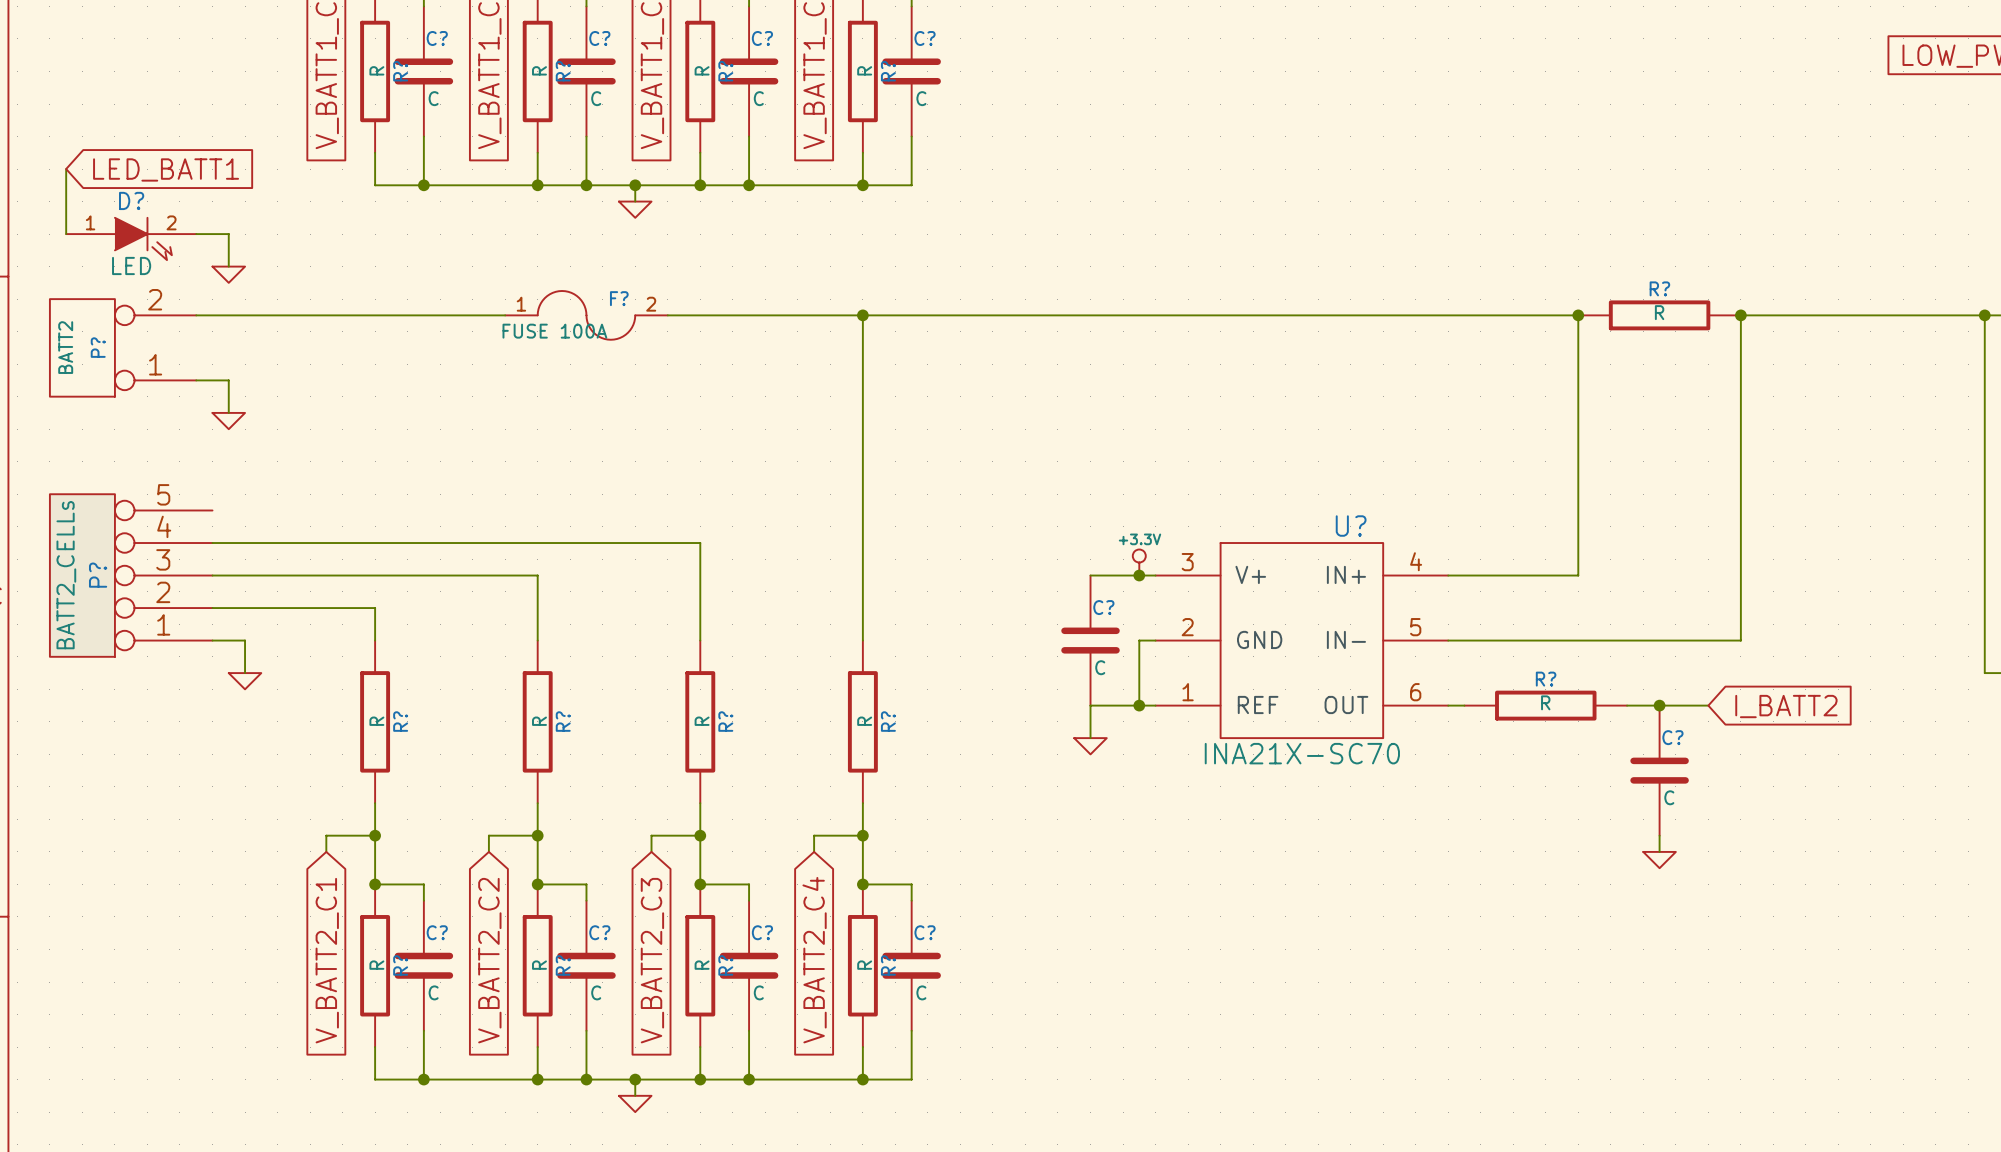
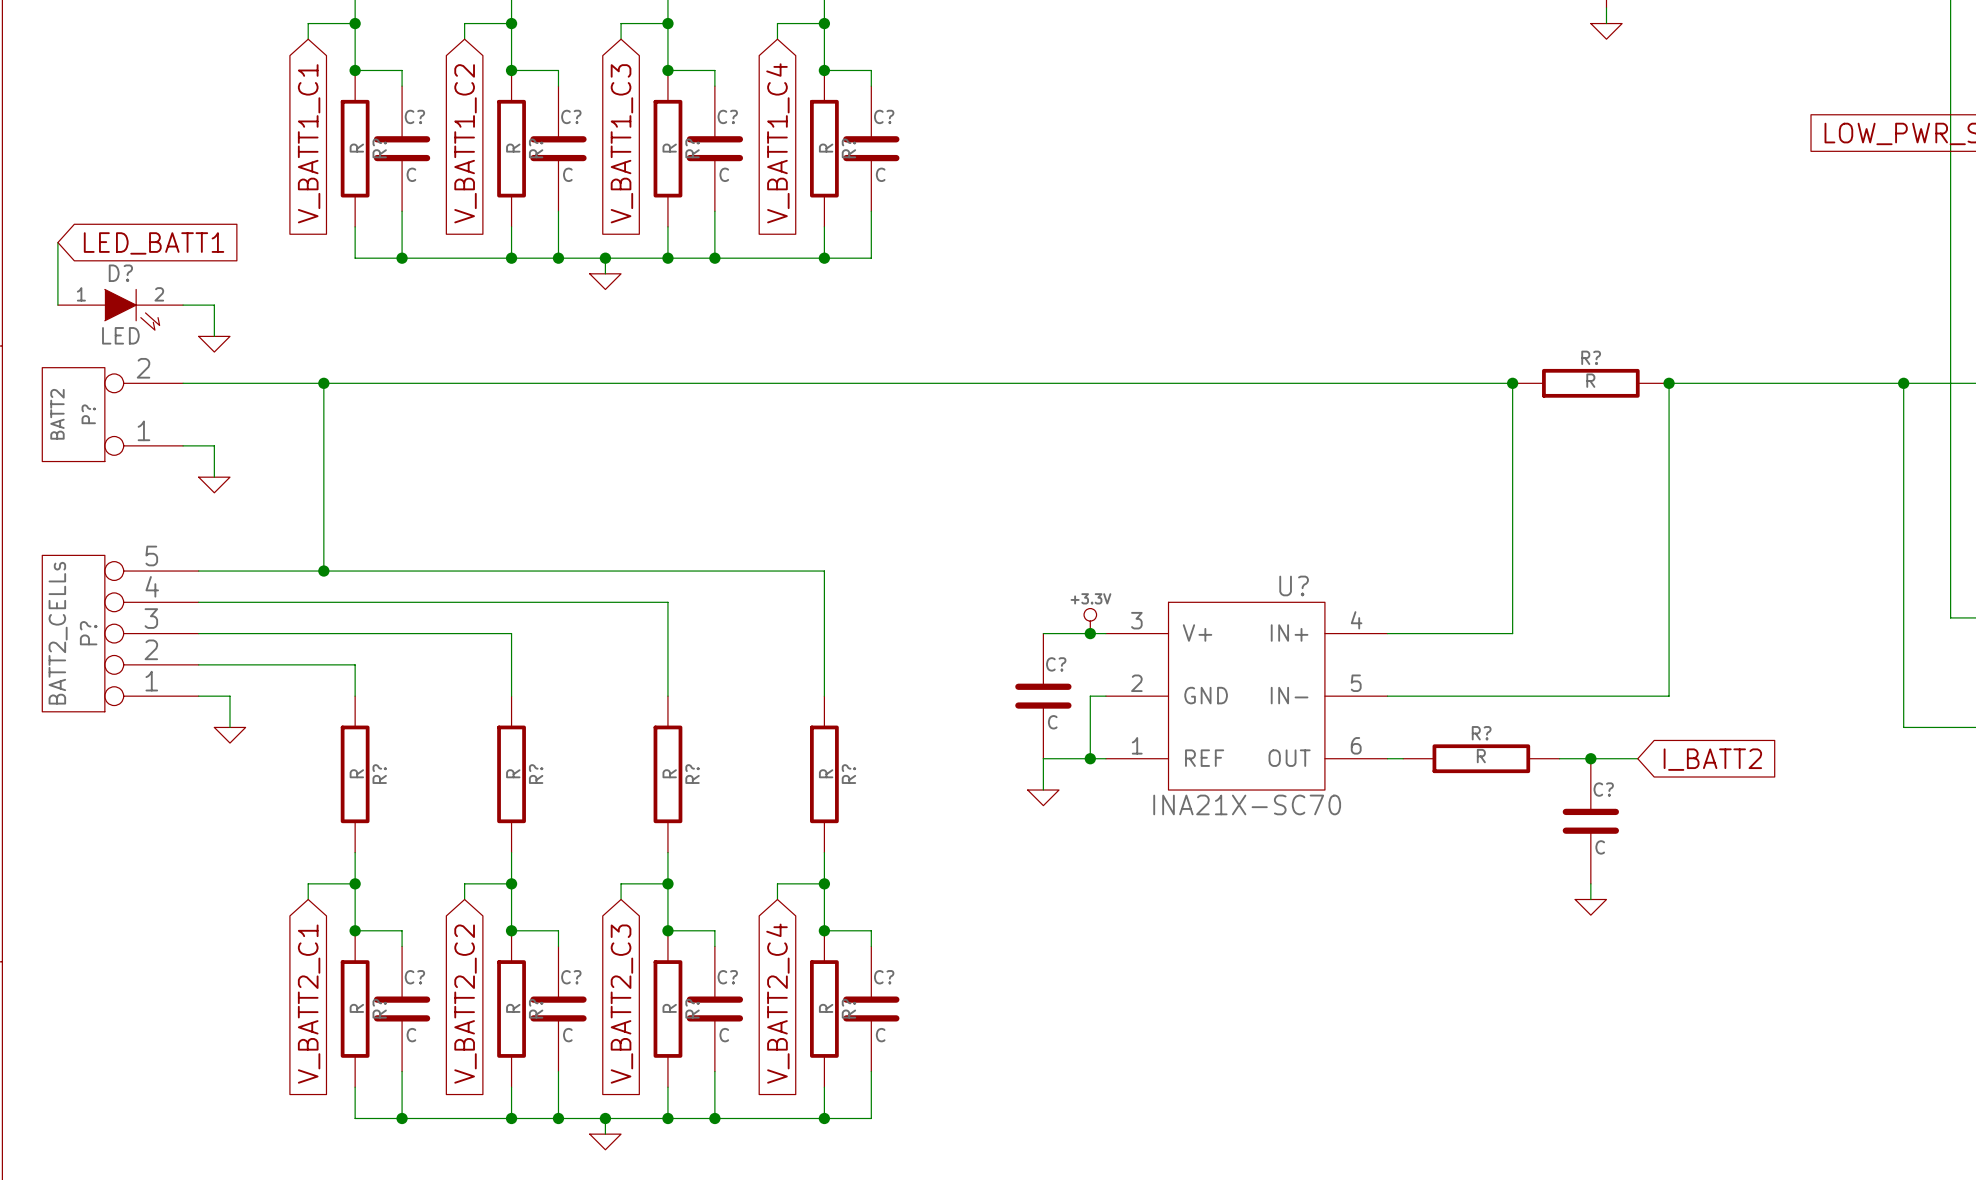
wire: none -> (323, 383) (323, 571)
junction: none -> (323, 383)
wire: none -> (480, 383) (636, 383)
F?: FUSE 100A (586, 315) -> none
wire: (862, 315) (862, 510) -> (198, 571) (824, 571)
junction: (862, 315) -> none
junction: none -> (323, 571)

